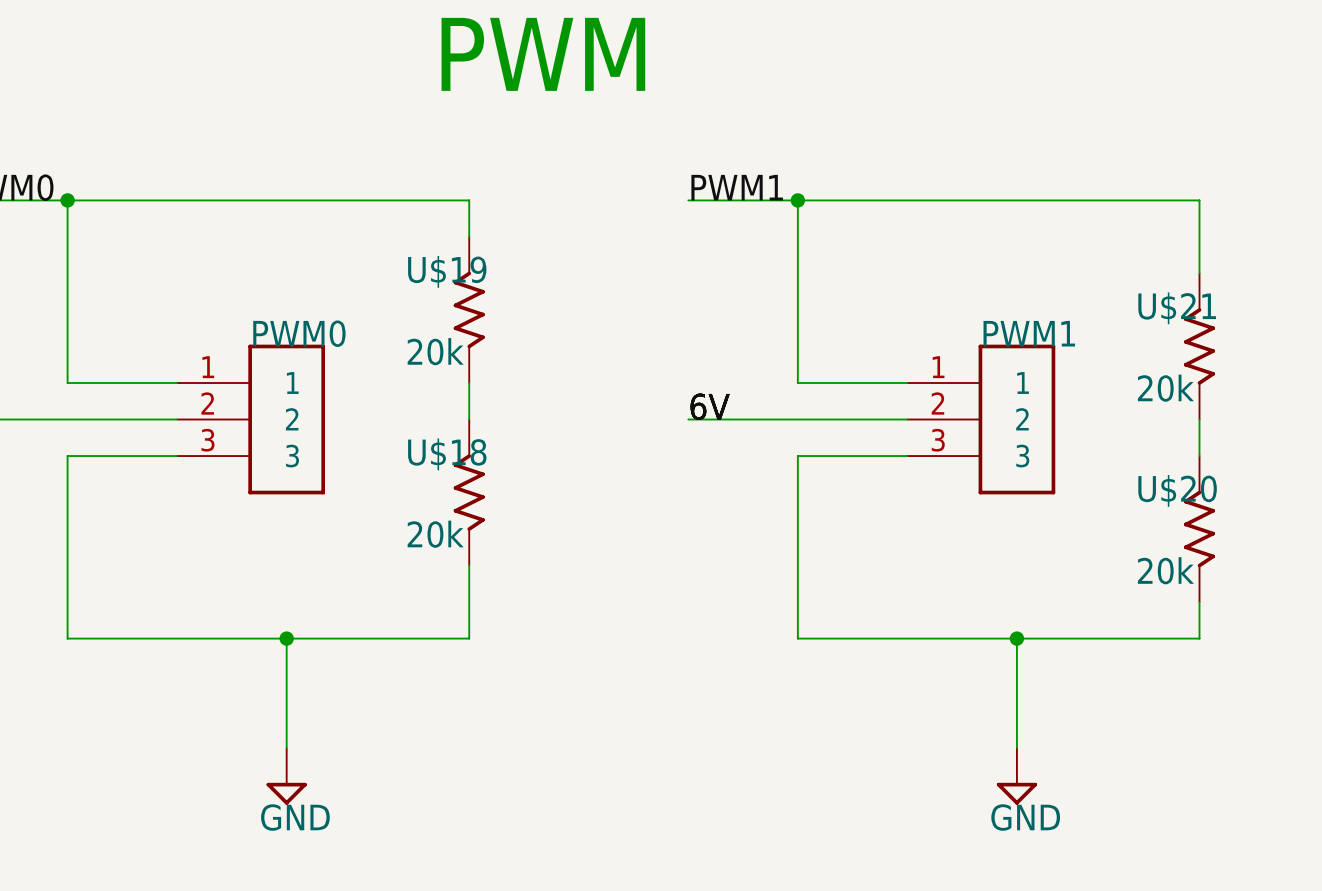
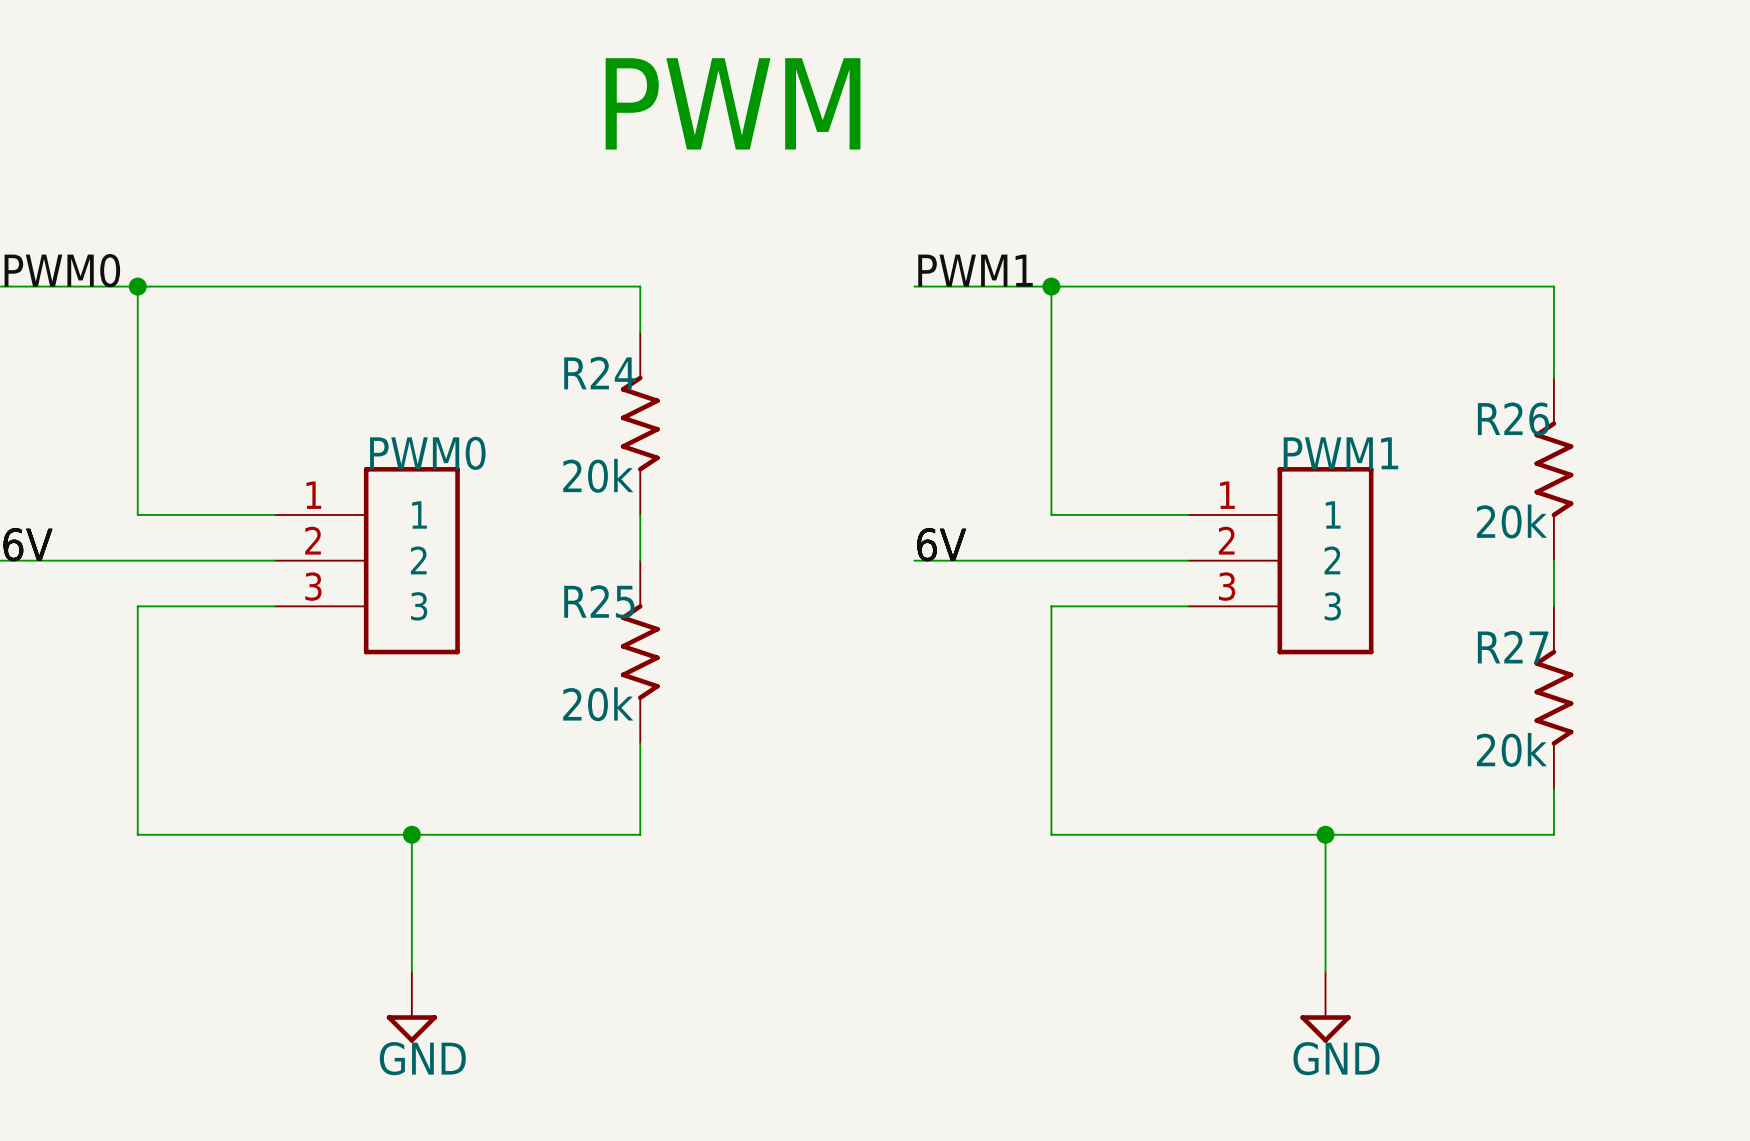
U$19 name: U$19 (447, 271) -> R24 (599, 373)
U$21 name: U$21 (1177, 308) -> R26 (1513, 419)
U$18 name: U$18 (447, 454) -> R25 (599, 601)
U$20 name: U$20 (1177, 490) -> R27 (1513, 647)

